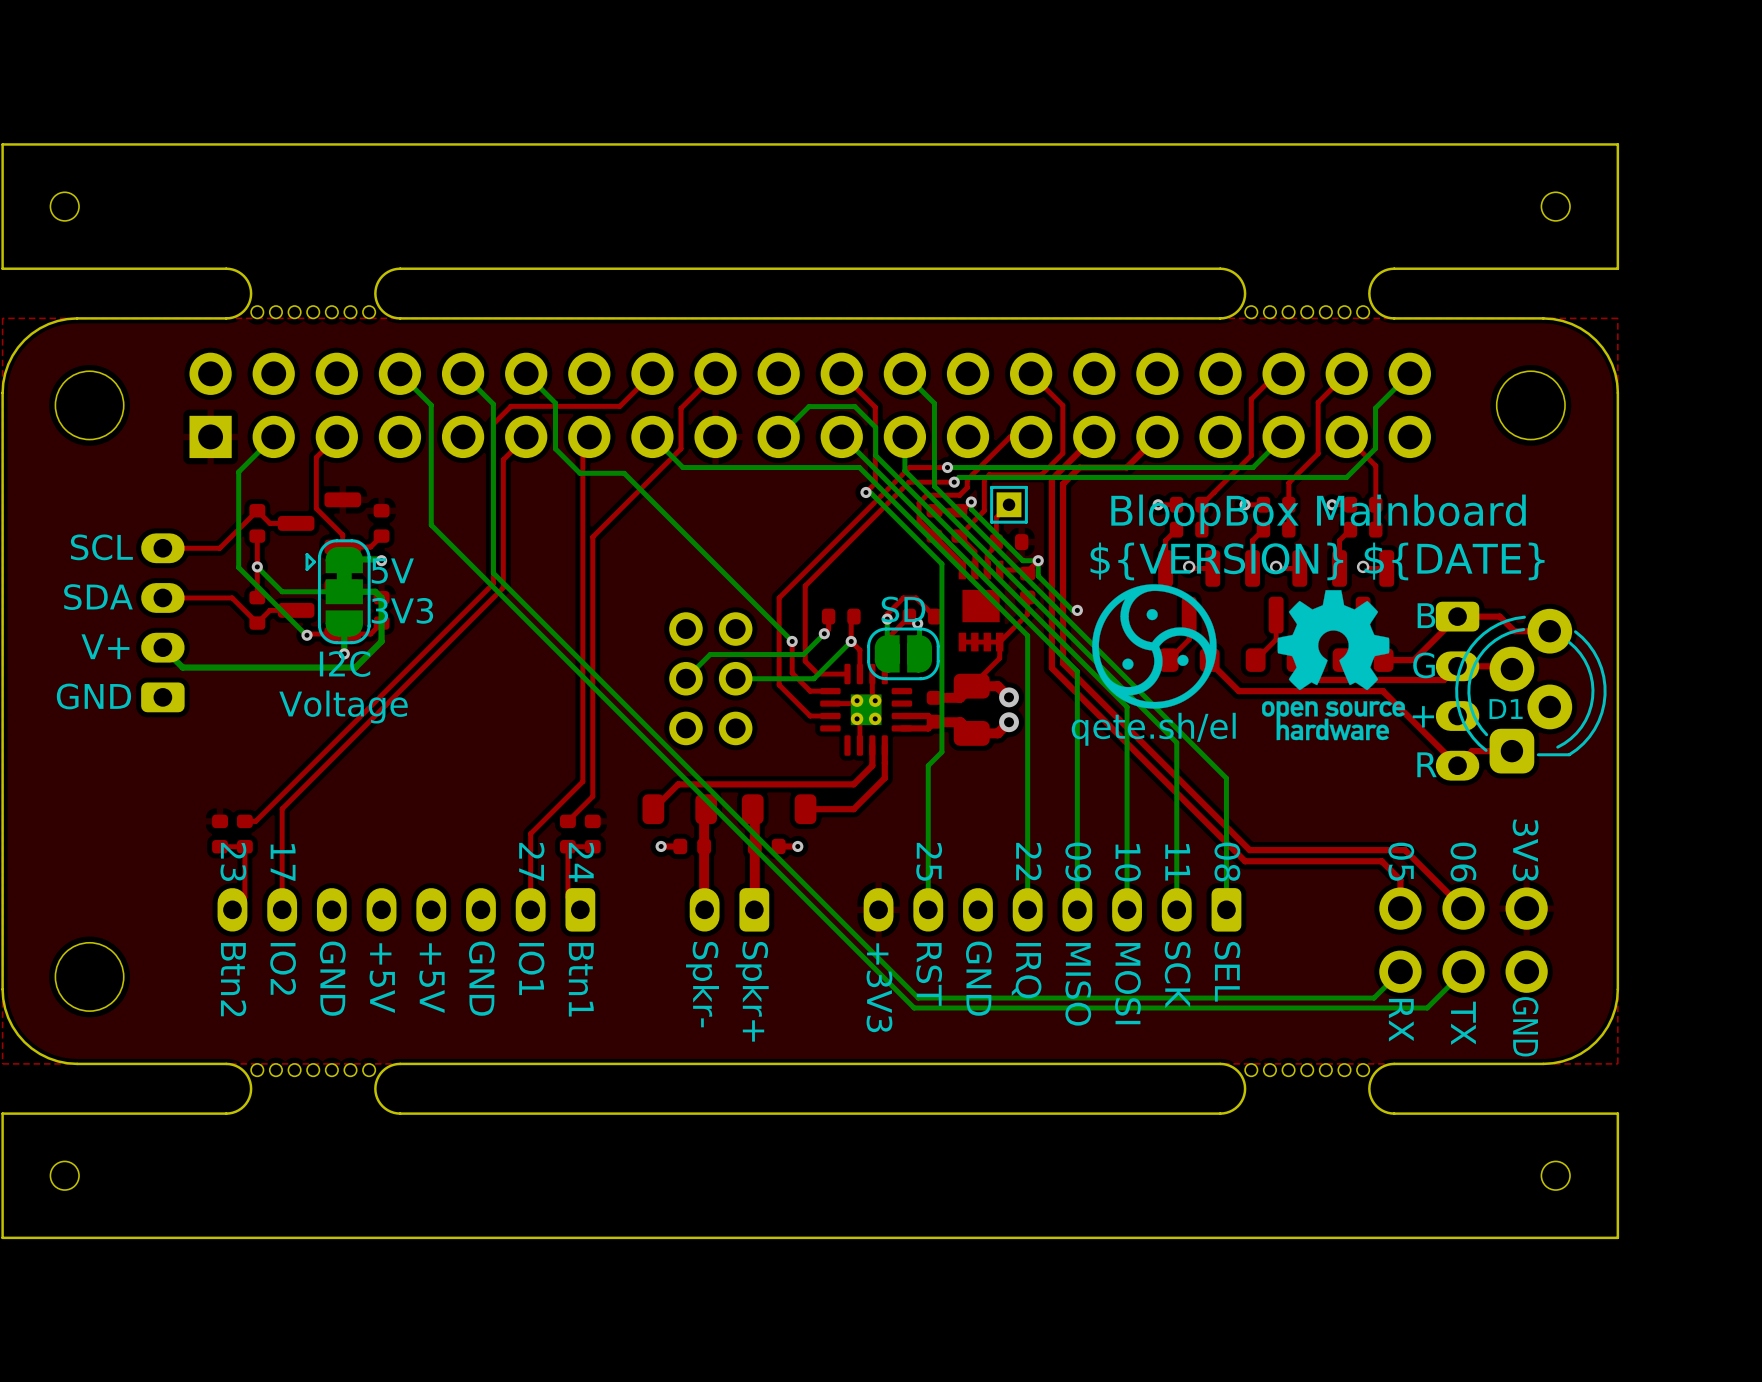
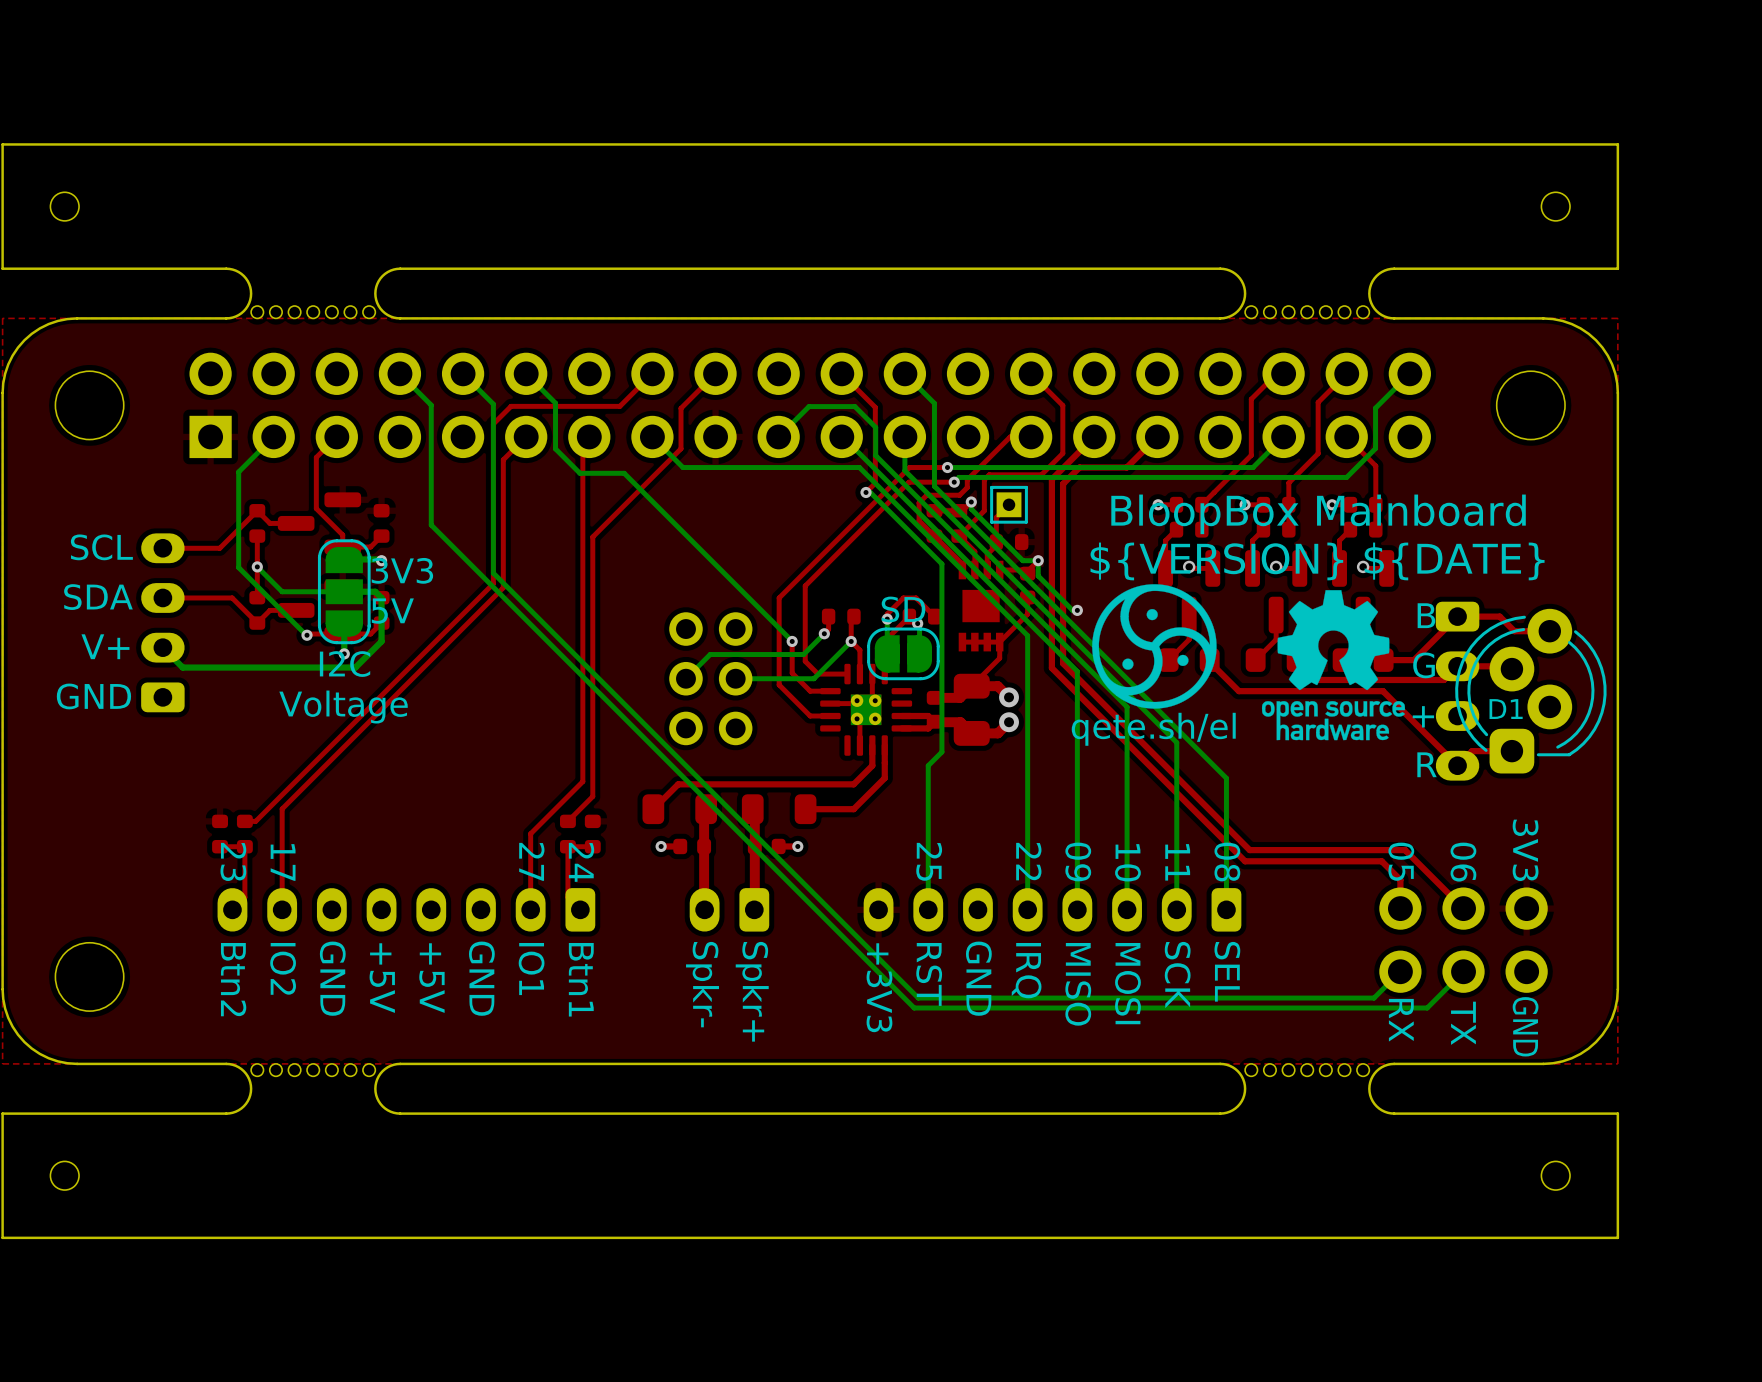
part footprint: [305, 539, 371, 645] -> [317, 539, 371, 645]
text: 5V (392, 571) -> 3V3 (402, 570)
text: 3V3 (402, 610) -> 5V (392, 611)

